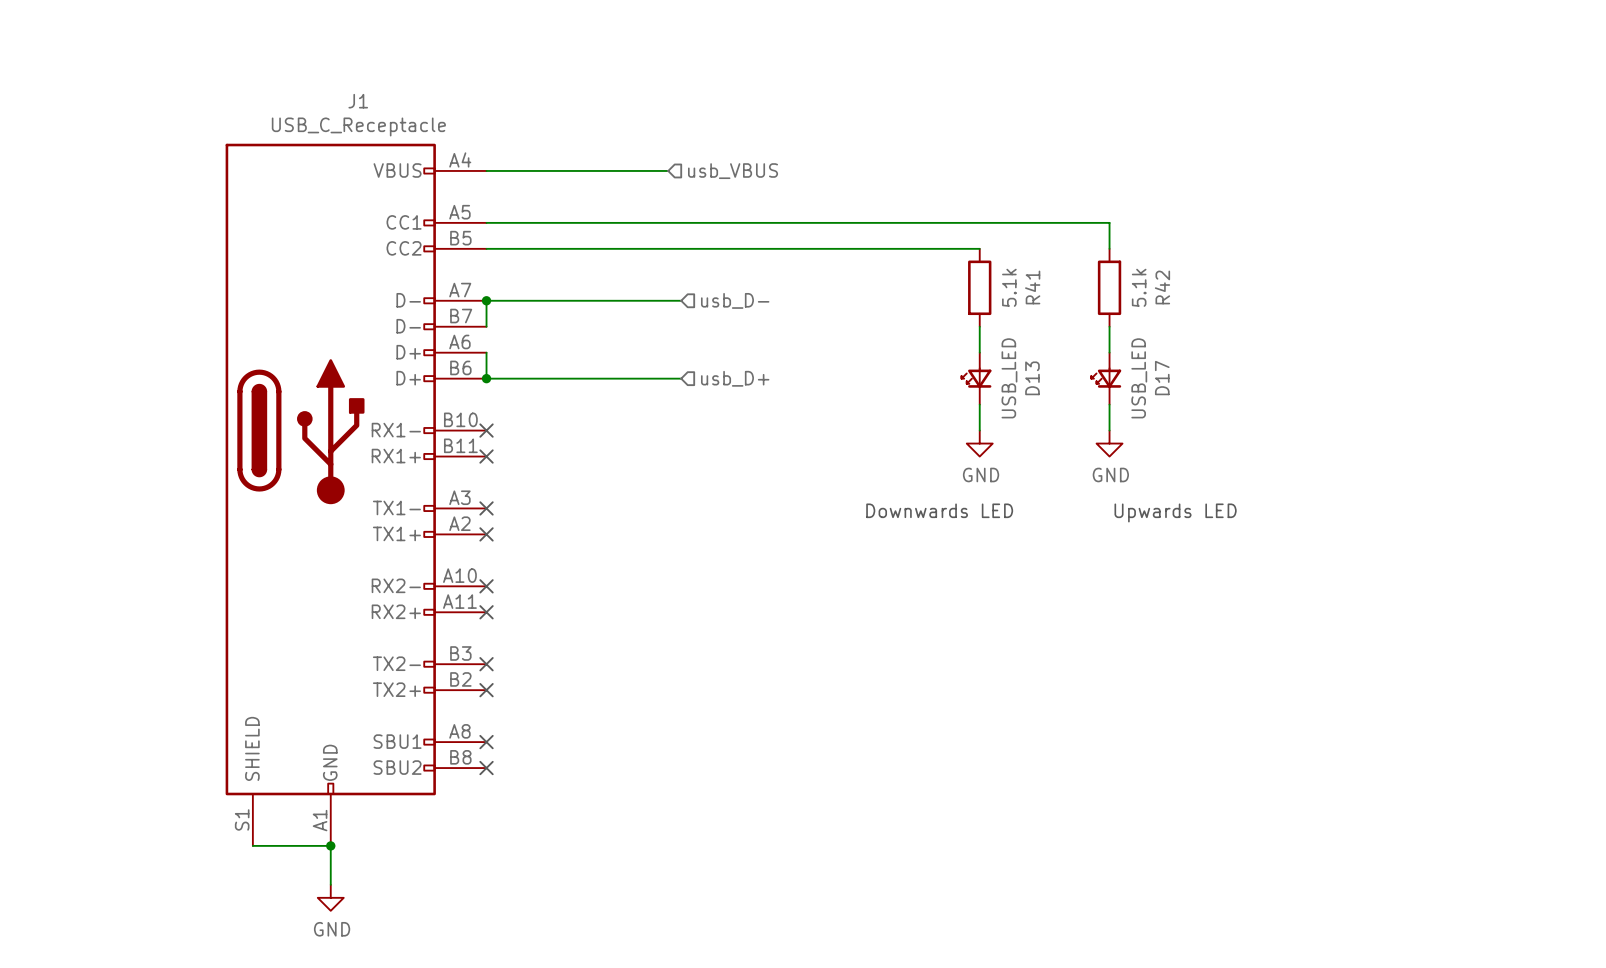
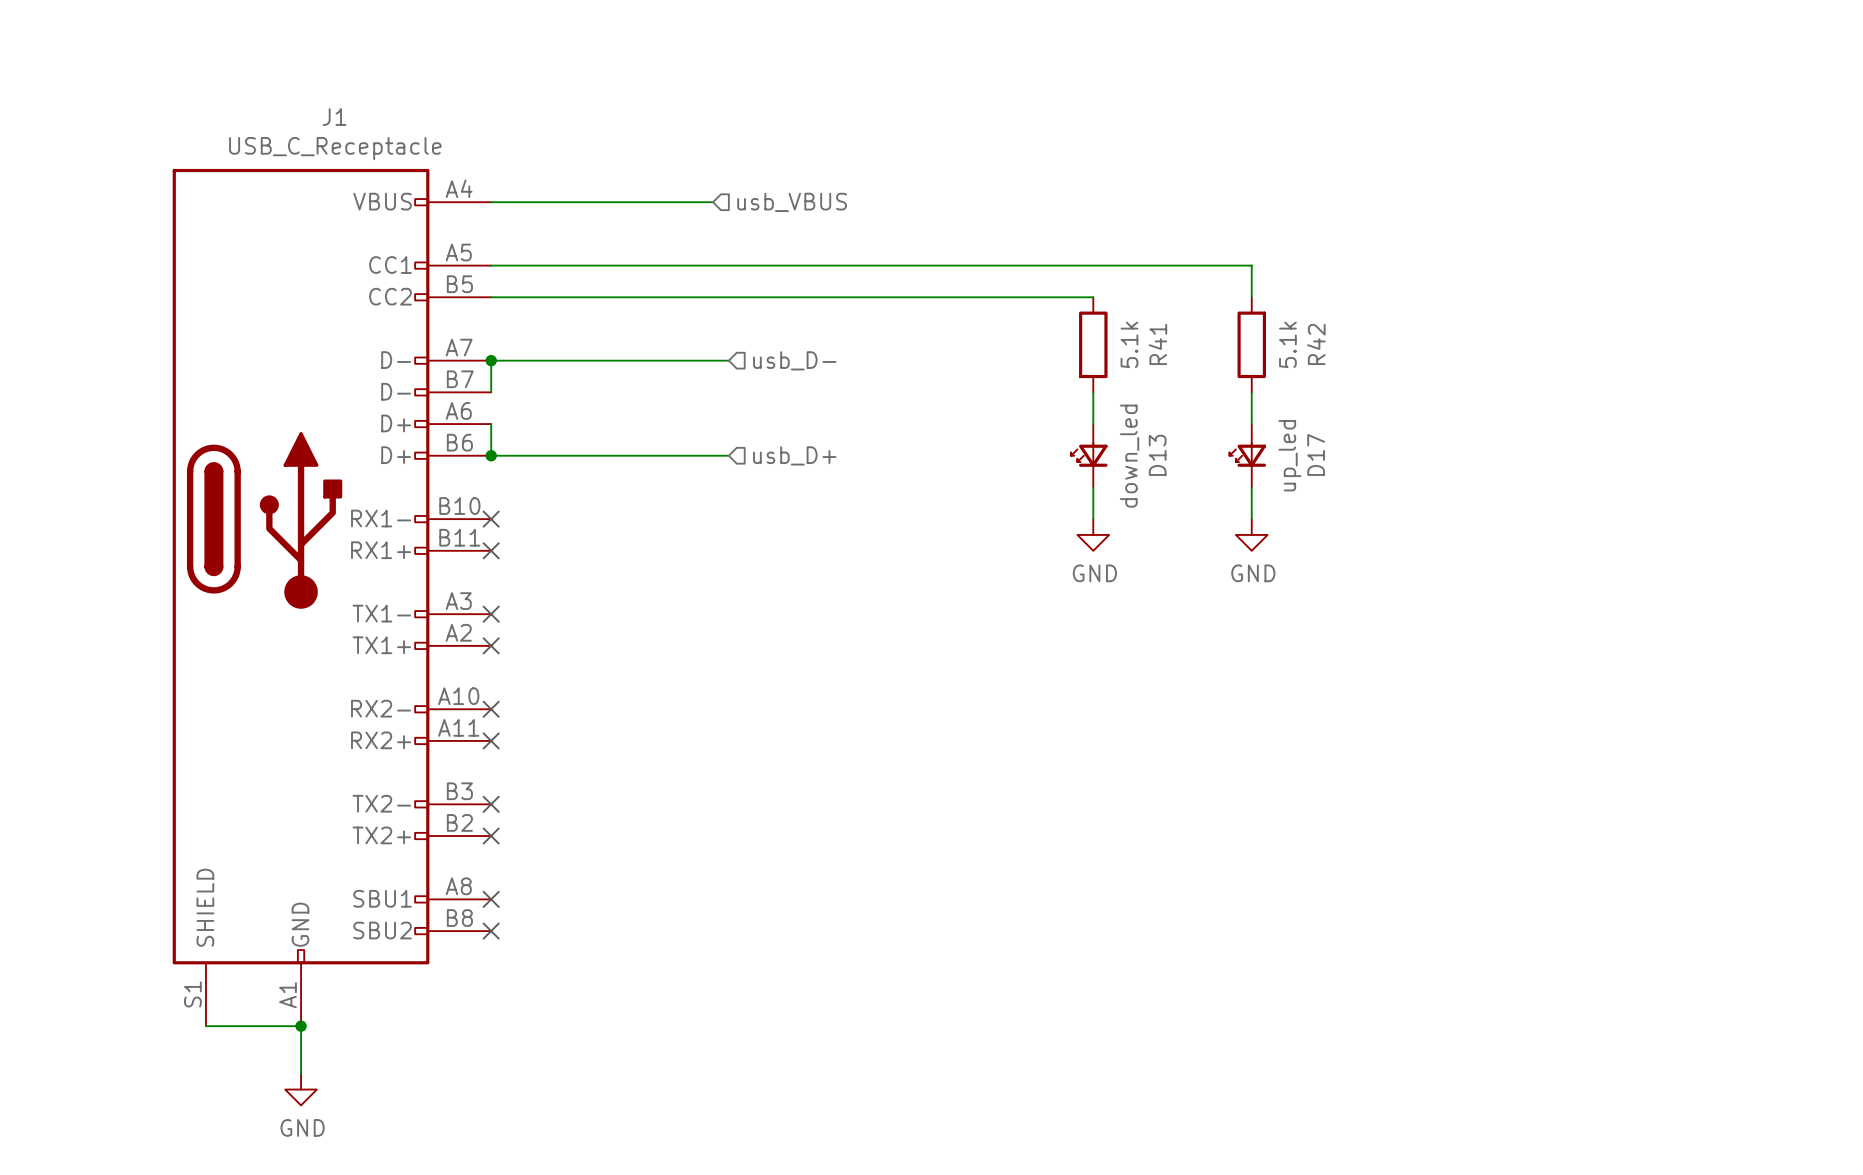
D13 value: USB_LED (1009, 378) -> down_led (1129, 456)
D17 value: USB_LED (1139, 378) -> up_led (1289, 455)
text: Downwards LED (939, 510) -> none
text: Upwards LED (1175, 512) -> none

